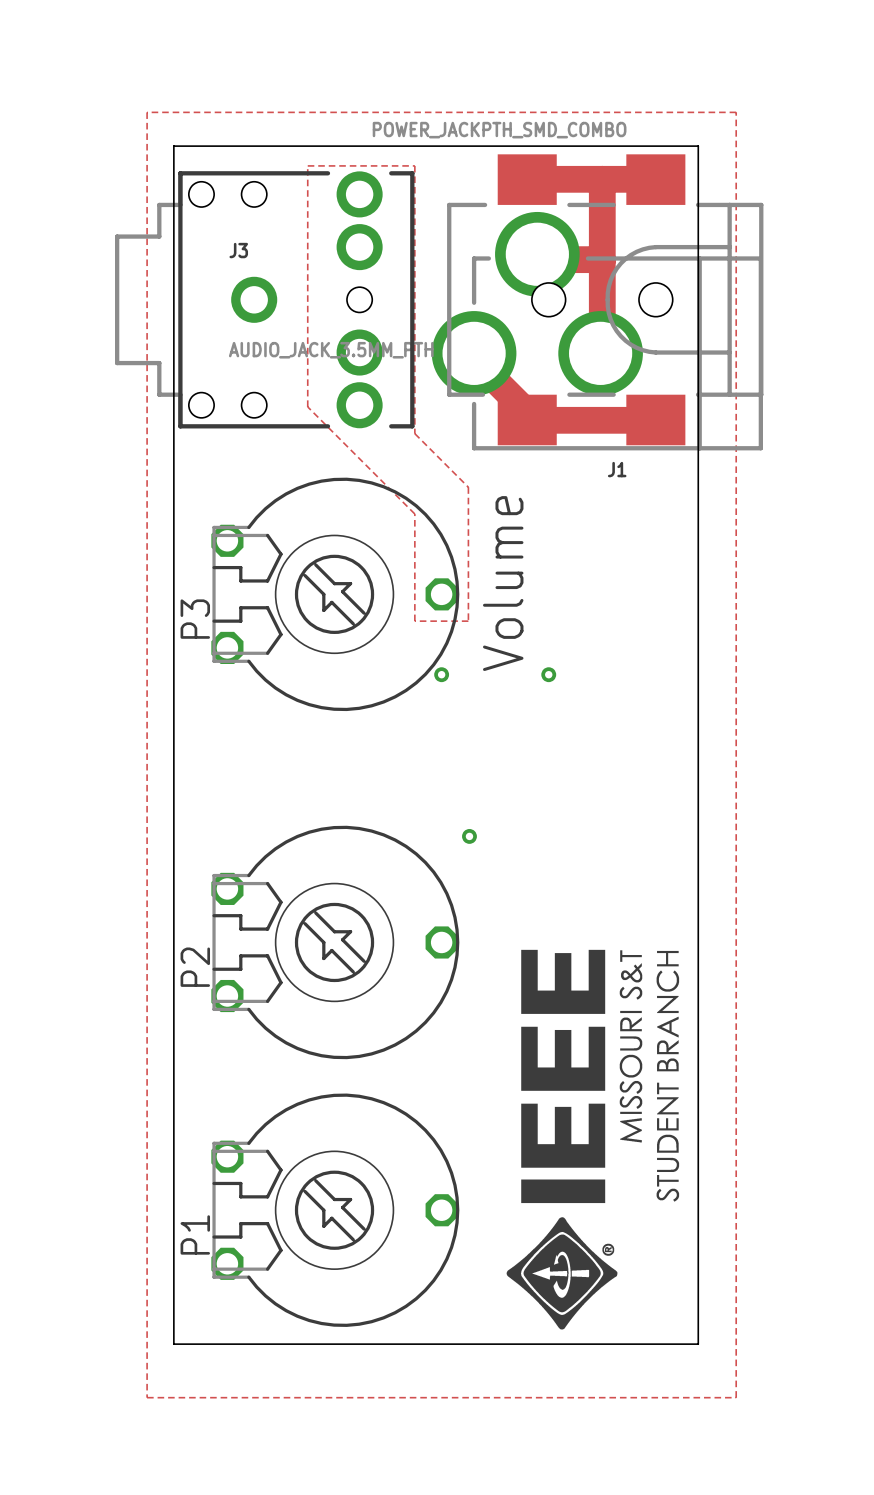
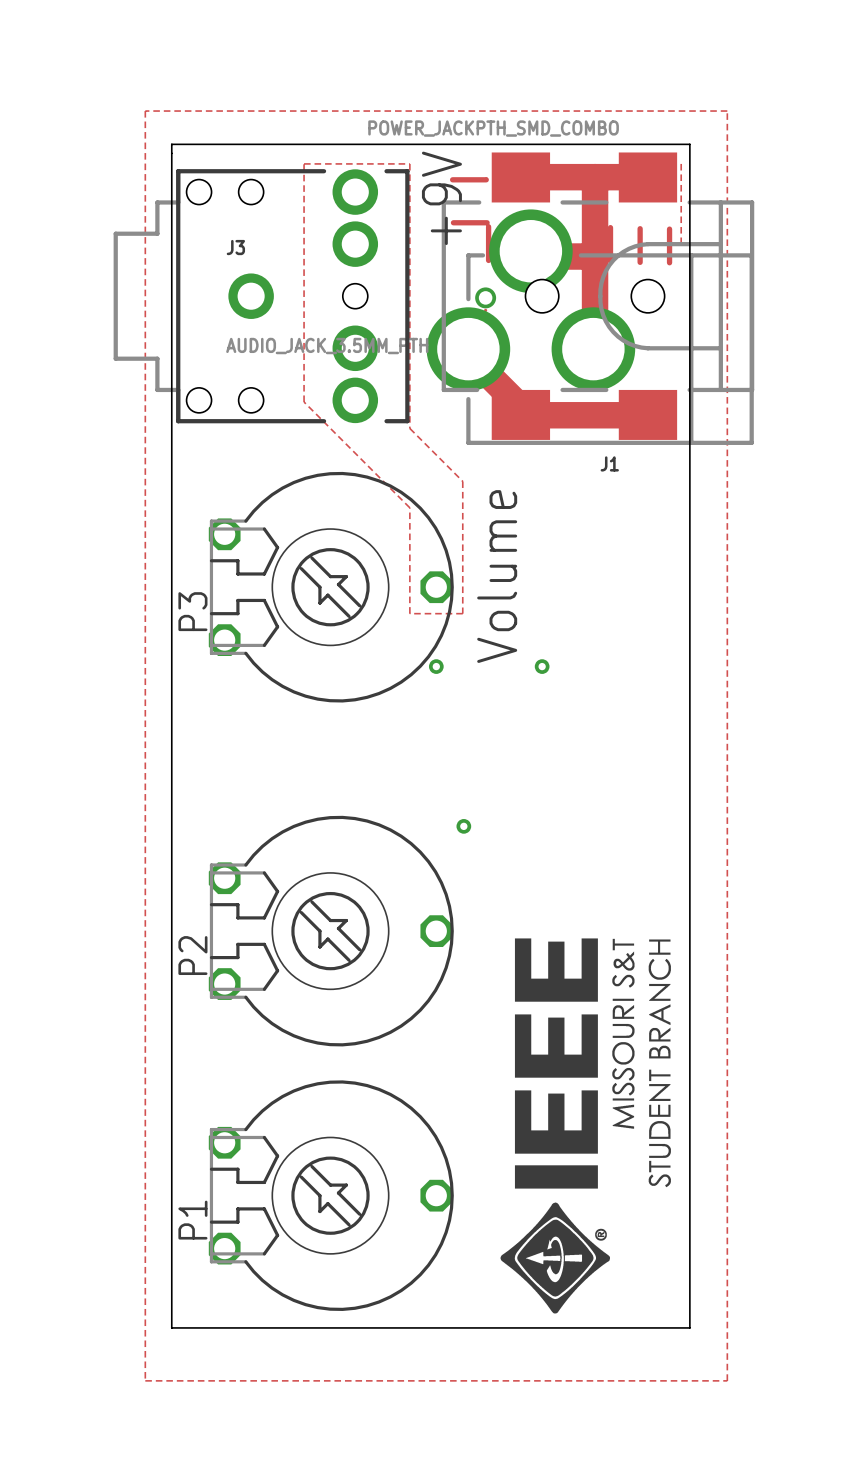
zone outline: none -> (681, 163) (681, 243)
track: none -> (486, 178) (452, 179)
text: none -> +9V (441, 198)
track: none -> (453, 222) (487, 222)
track: none -> (488, 226) (488, 260)
track: none -> (610, 227) (610, 261)
track: none -> (640, 228) (640, 262)
track: none -> (669, 229) (669, 262)
via: none -> (485, 297)

